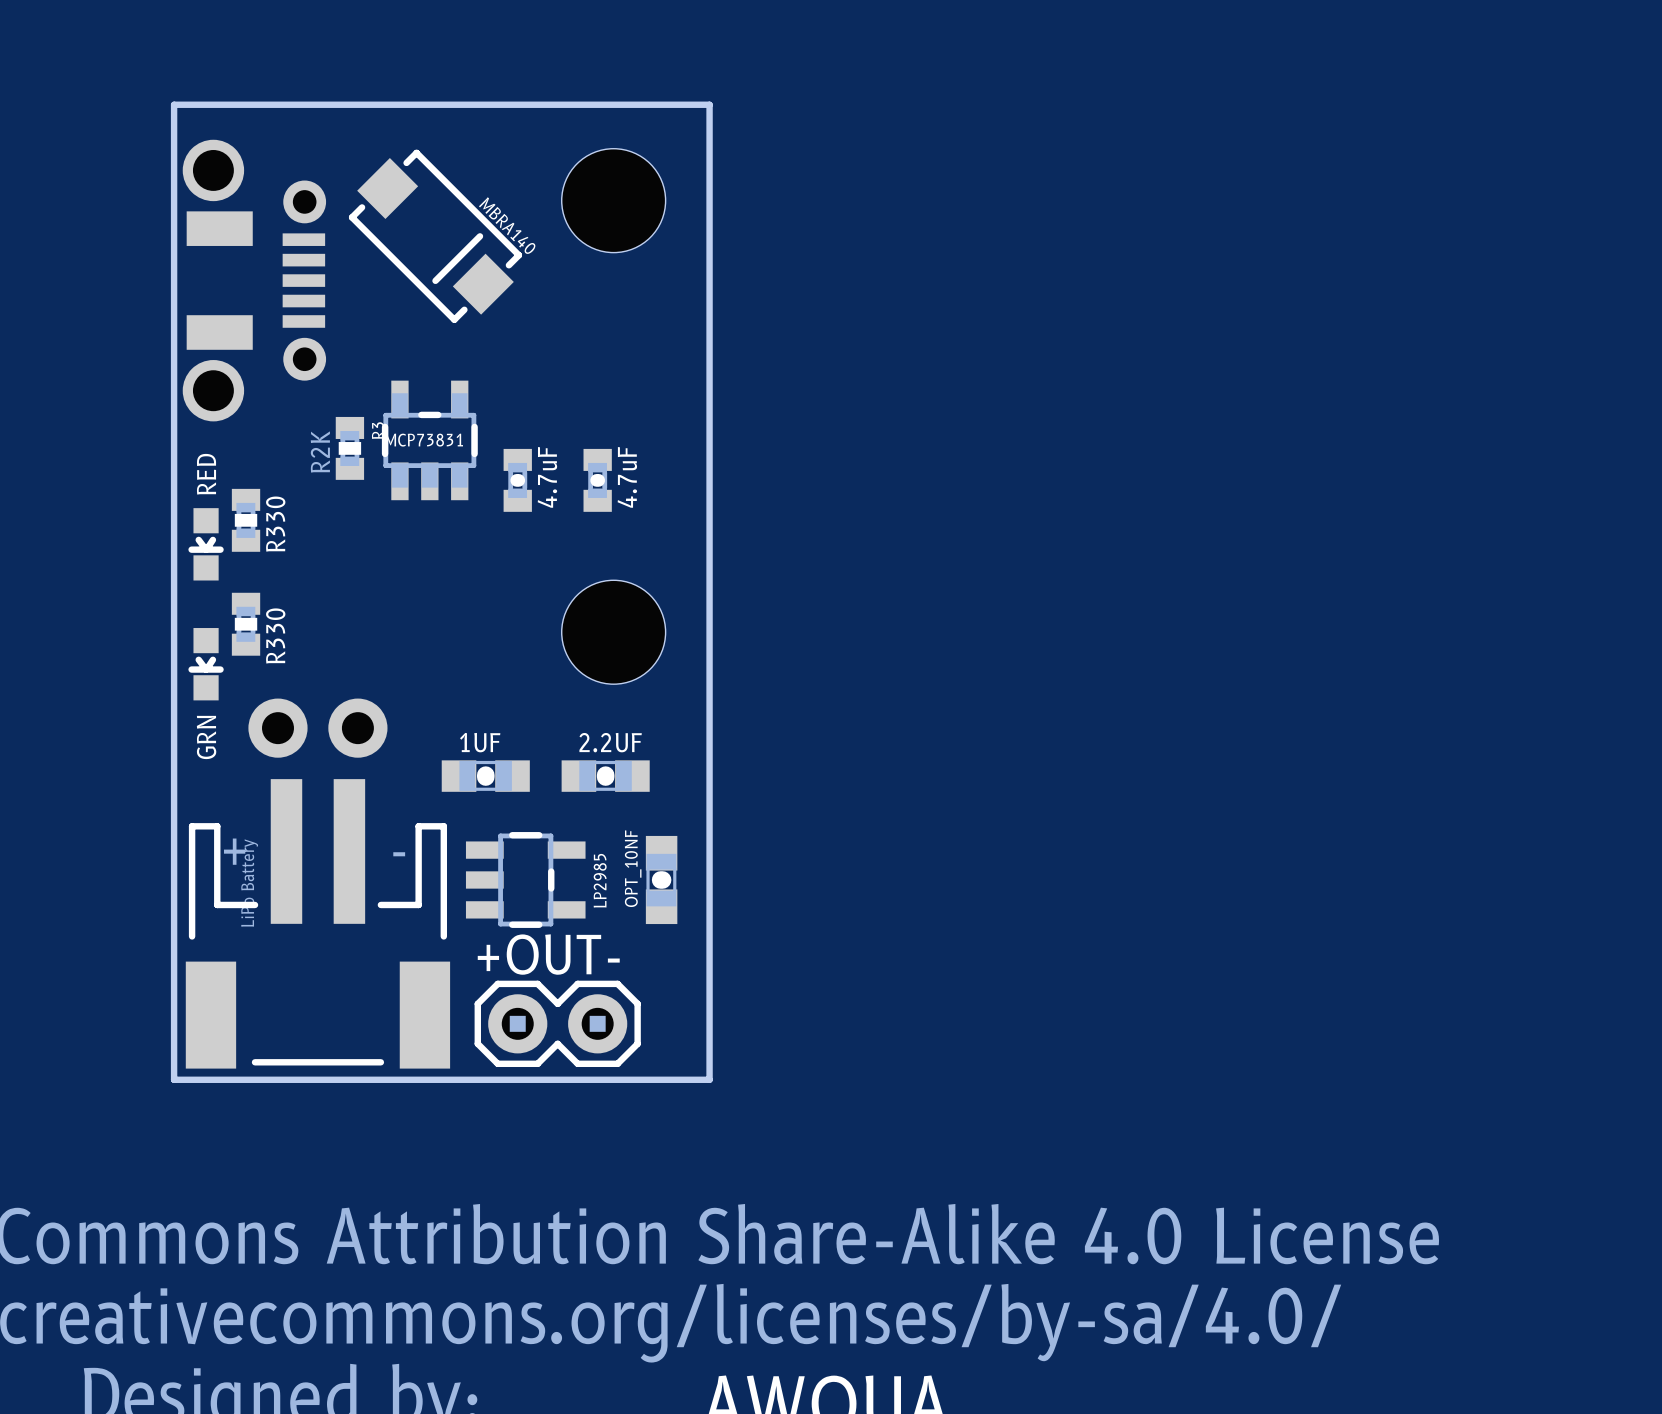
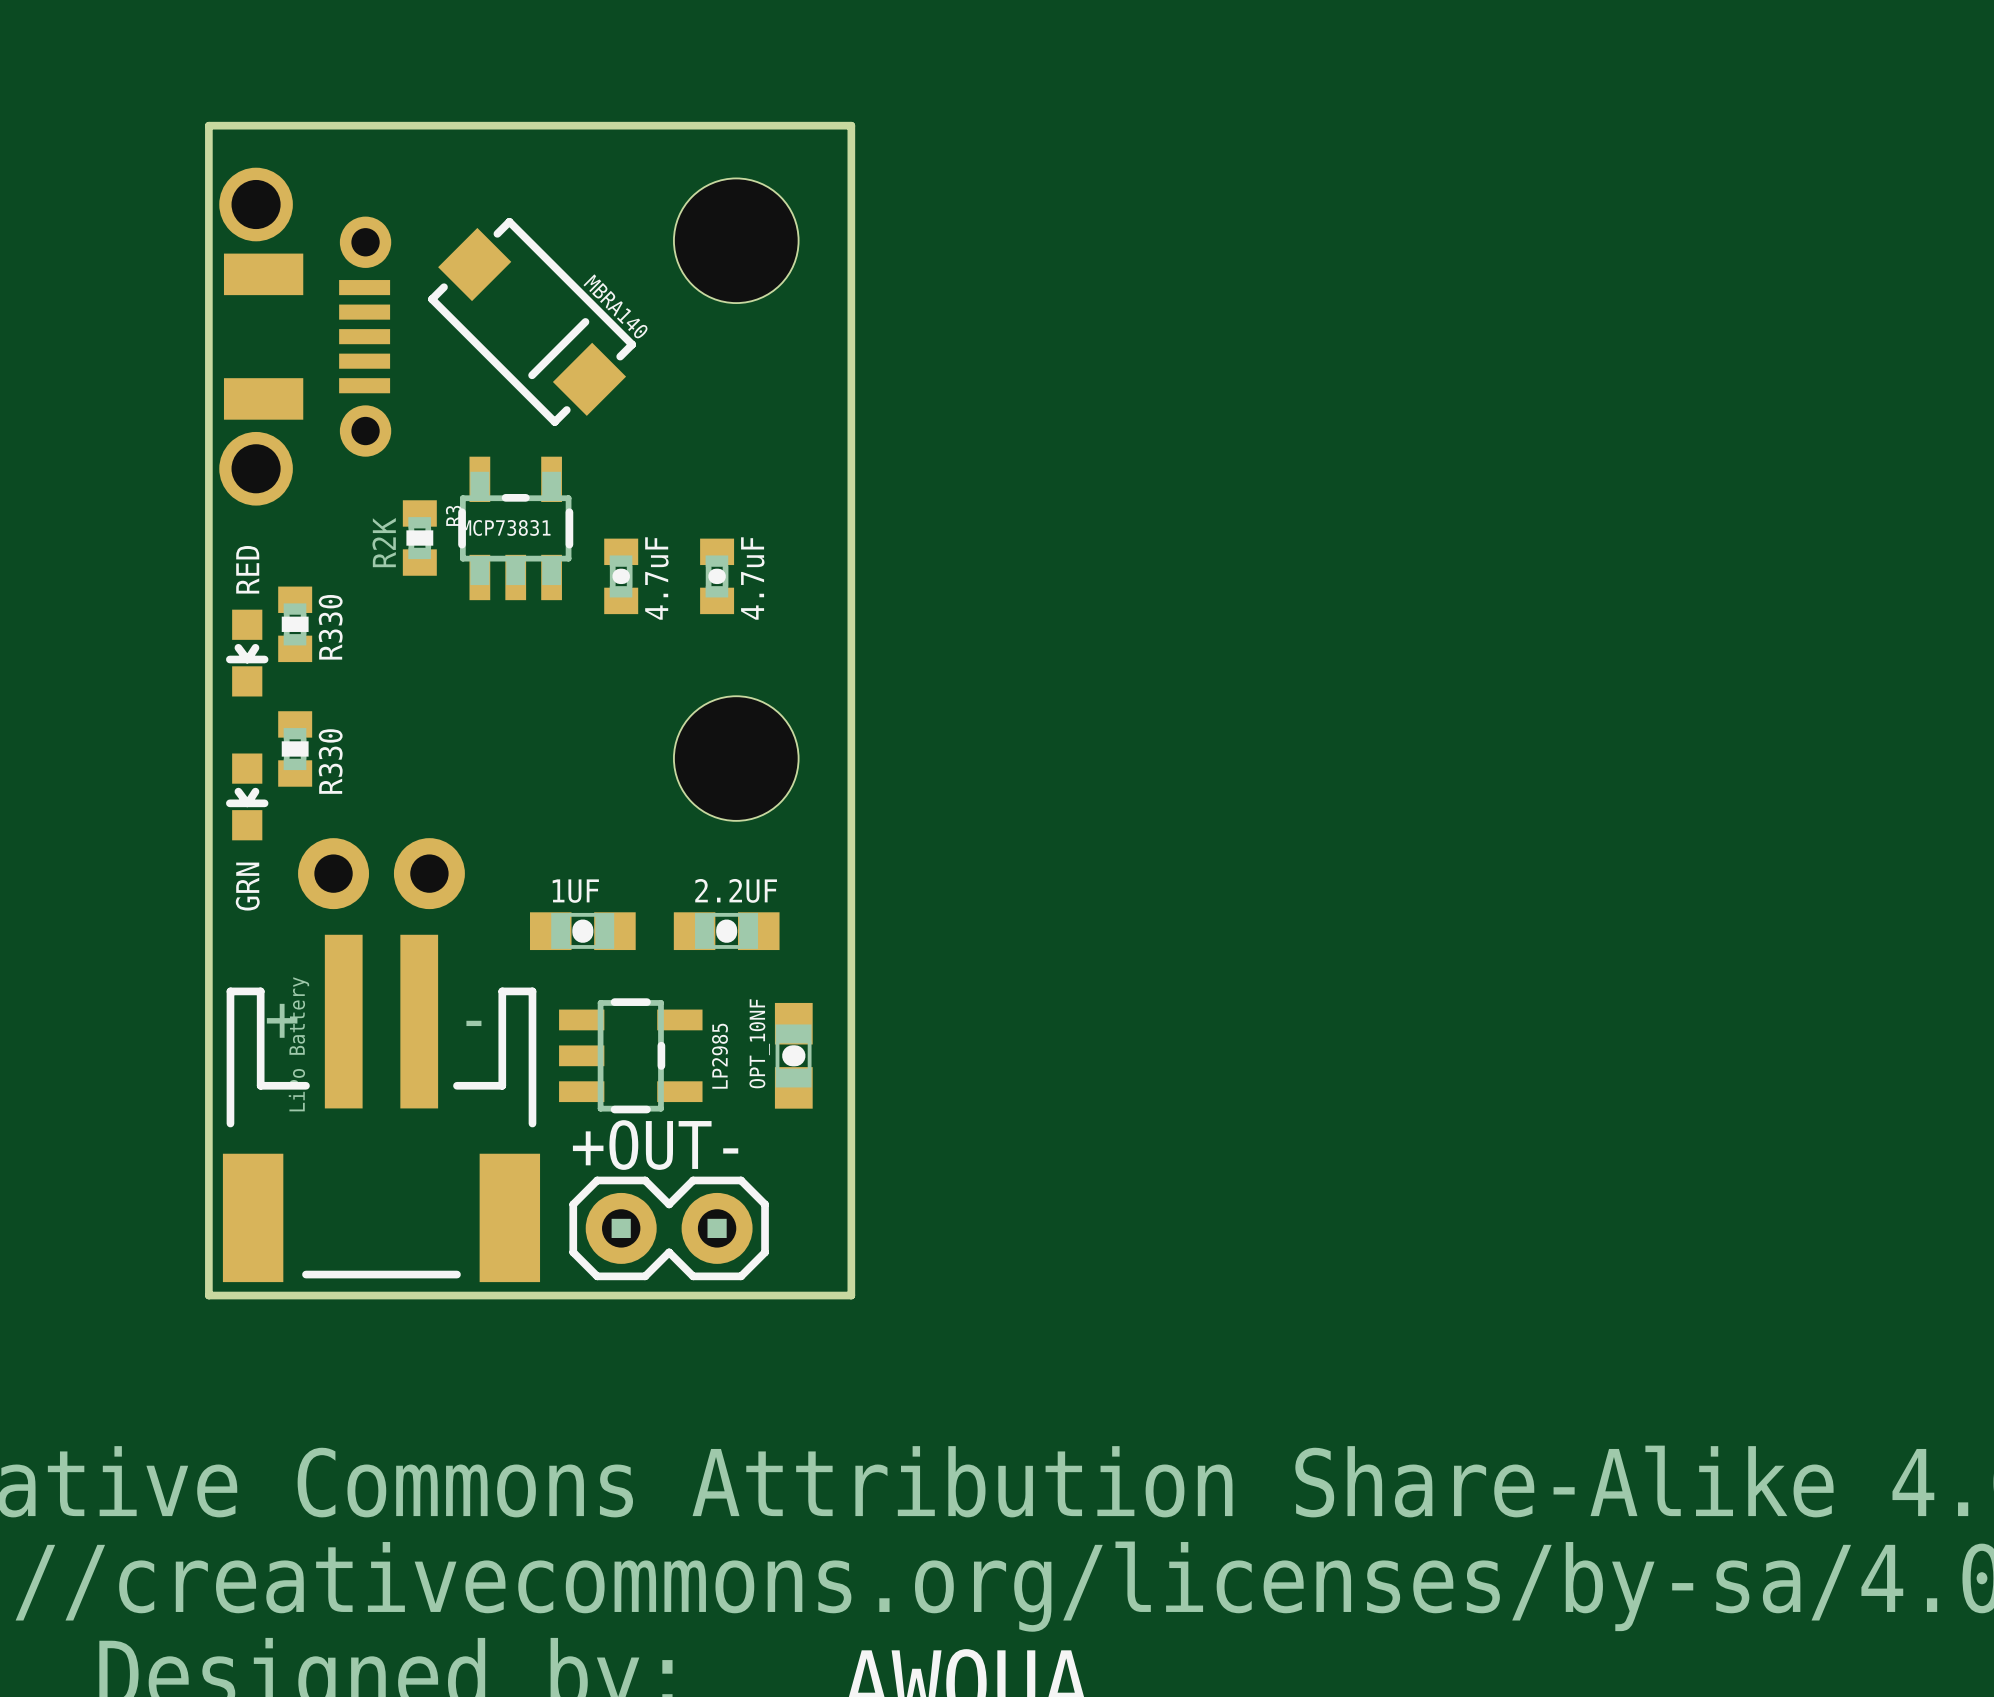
part position: (435, 236) -> (532, 321)

